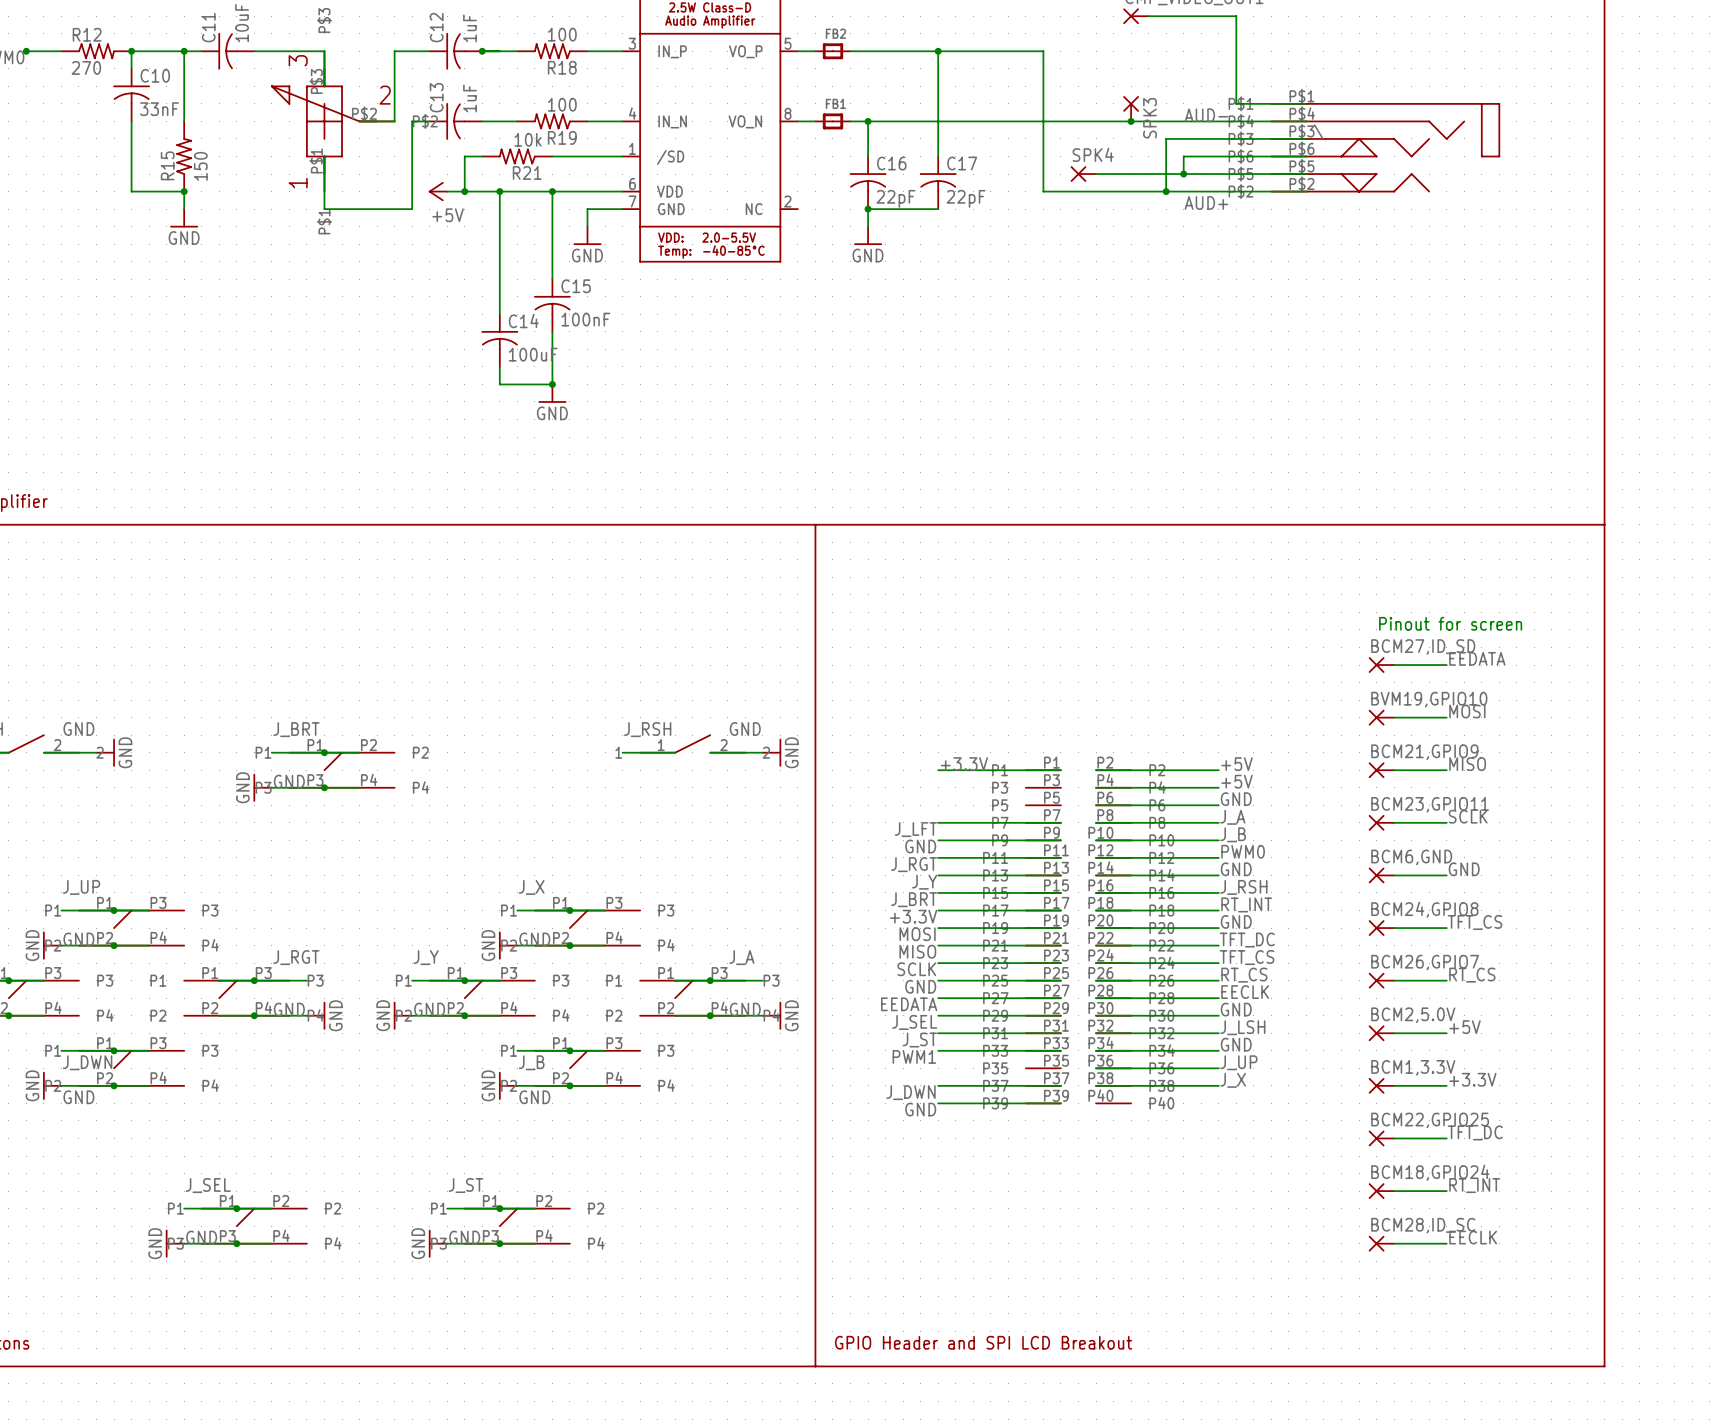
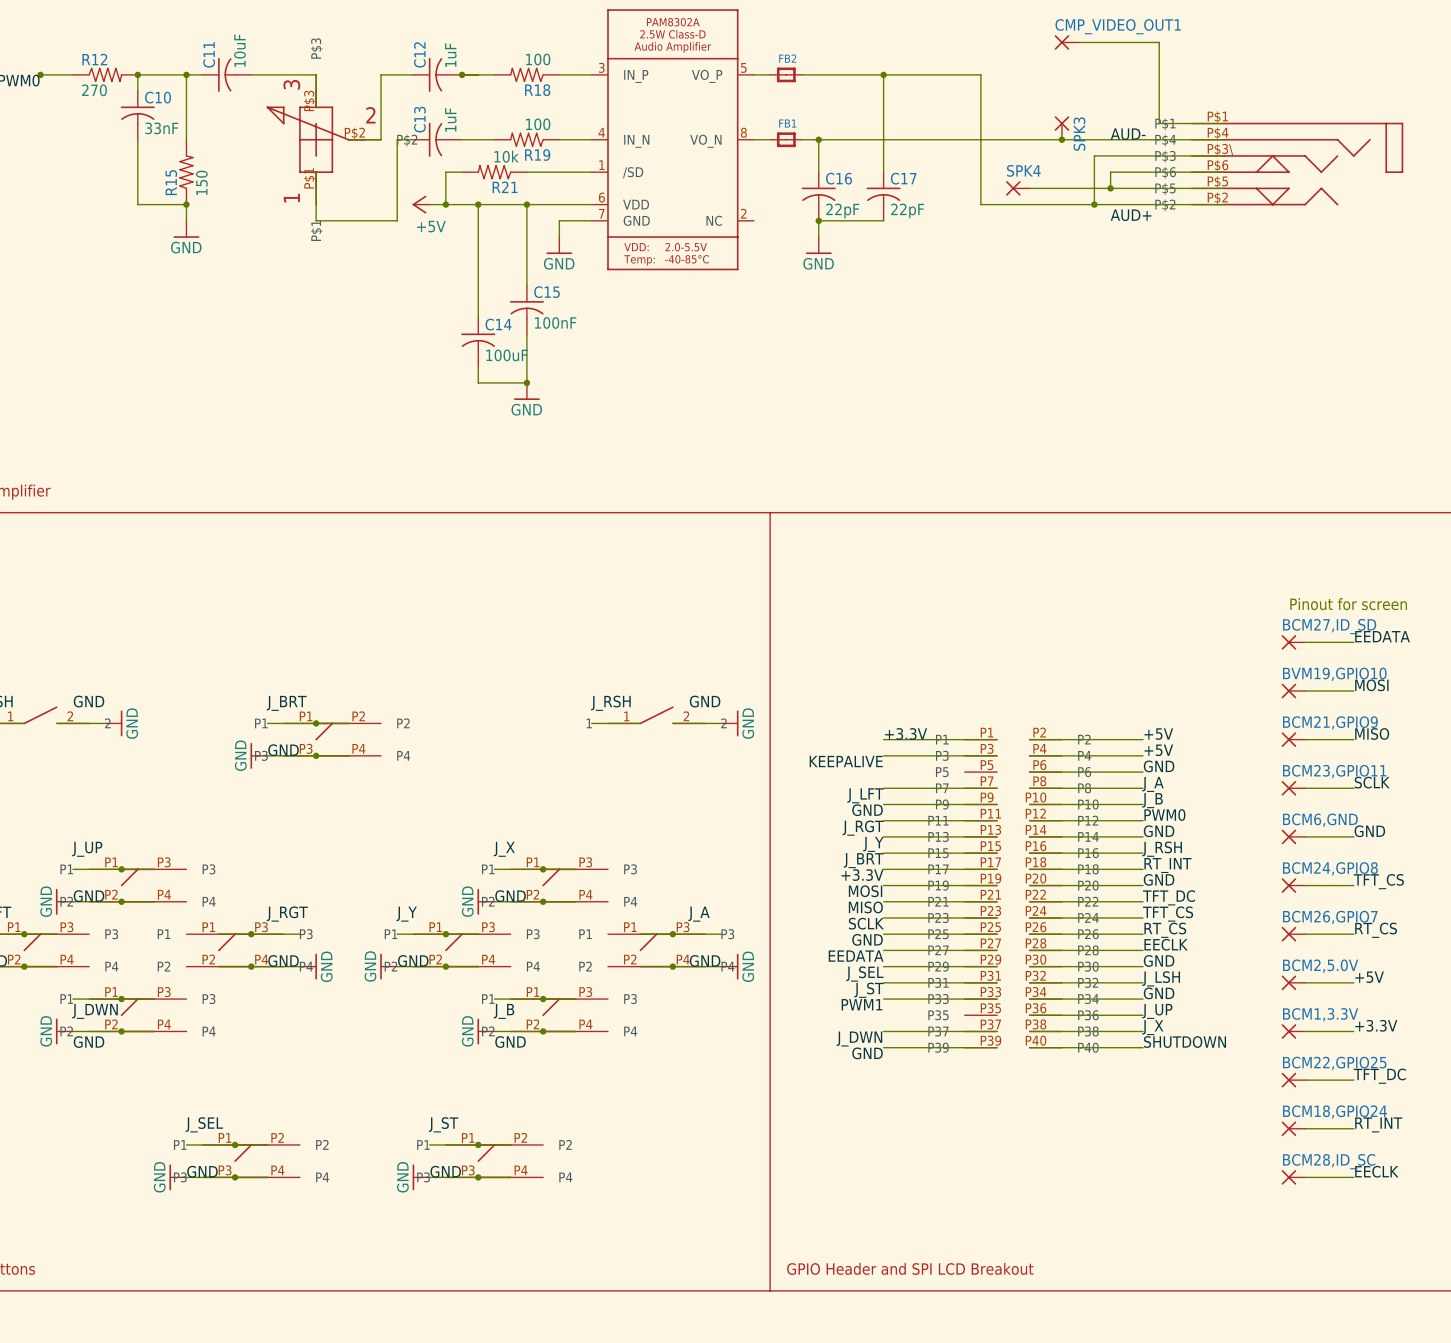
wire: none -> (883, 755) (997, 755)
label: none -> KEEPALIVE (846, 761)
label: none -> SHUTDOWN (1185, 1042)
wire: none -> (1029, 1047) (1143, 1047)

